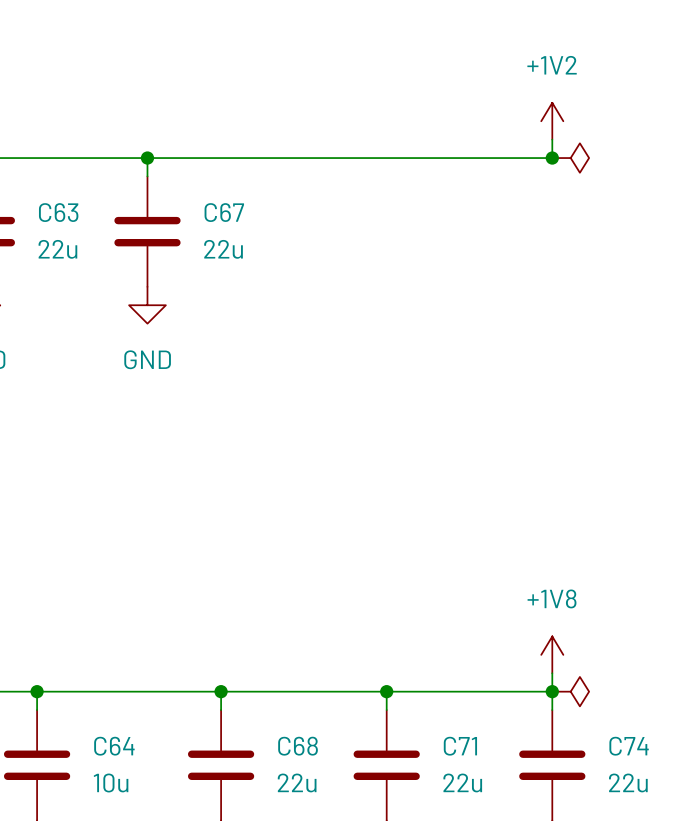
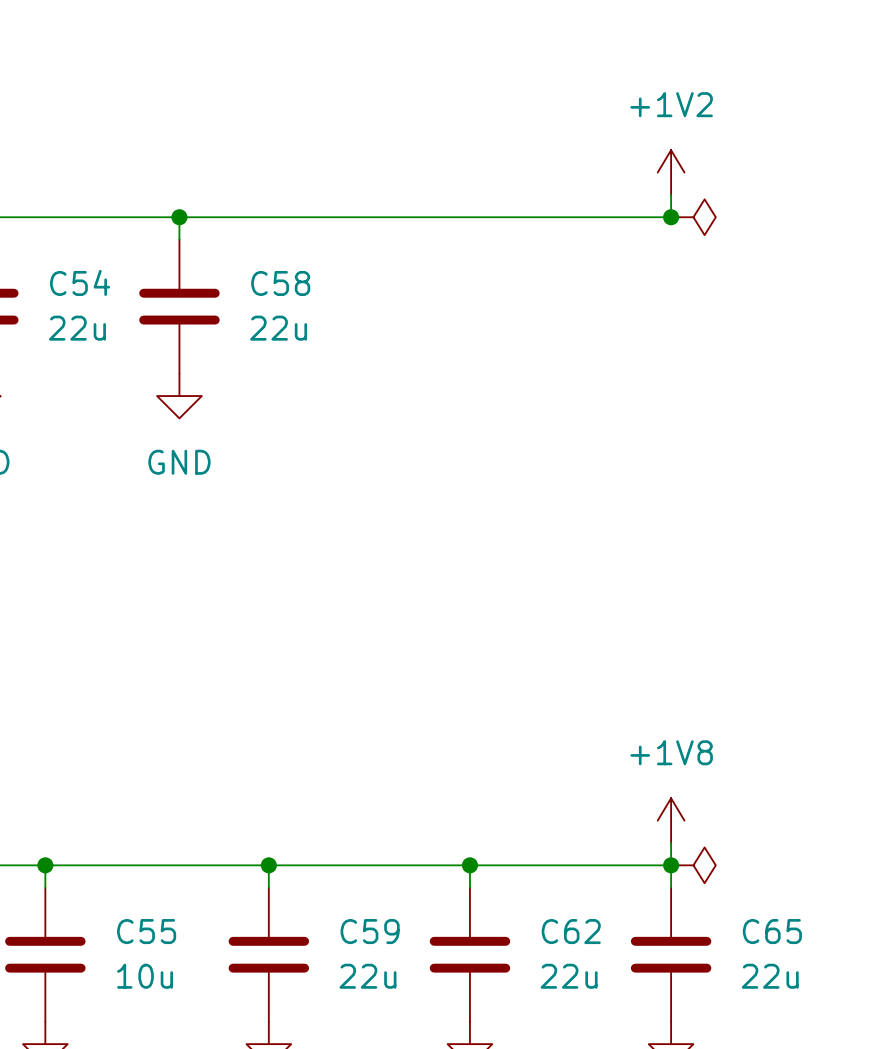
C63 name: C63 (58, 212) -> C54 (80, 282)
C67 name: C67 (224, 212) -> C58 (280, 283)
C64 name: C64 (114, 746) -> C55 (146, 931)
C68 name: C68 (298, 746) -> C59 (370, 931)
C71 name: C71 (460, 746) -> C62 (571, 931)
C74 name: C74 (629, 746) -> C65 (772, 931)

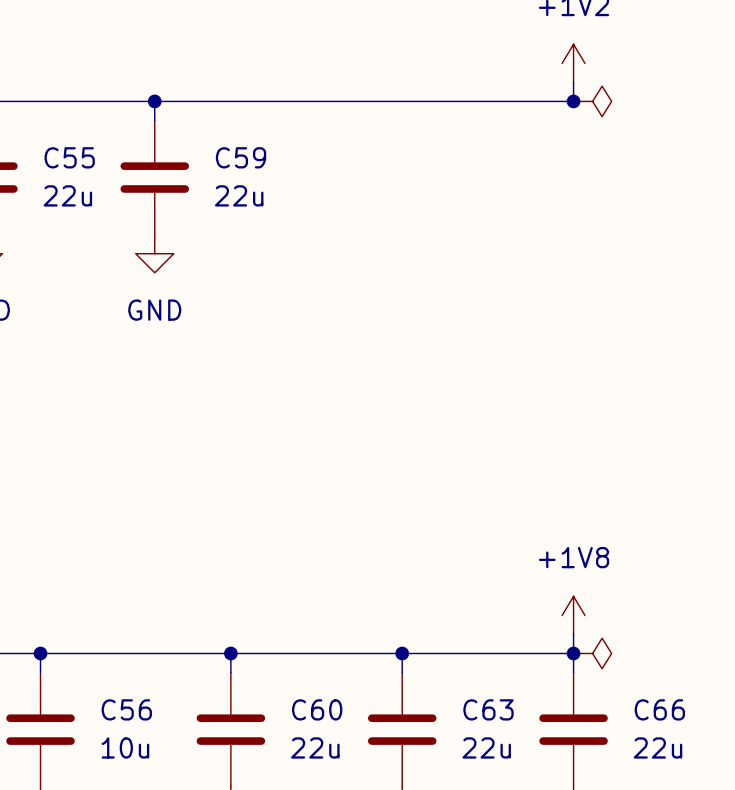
C54 name: C54 (80, 282) -> C55 (69, 157)
C58 name: C58 (280, 283) -> C59 (241, 157)
C55 name: C55 (146, 931) -> C56 (126, 709)
C59 name: C59 (370, 931) -> C60 (317, 709)
C62 name: C62 (571, 931) -> C63 (488, 709)
C65 name: C65 (772, 931) -> C66 (659, 709)

